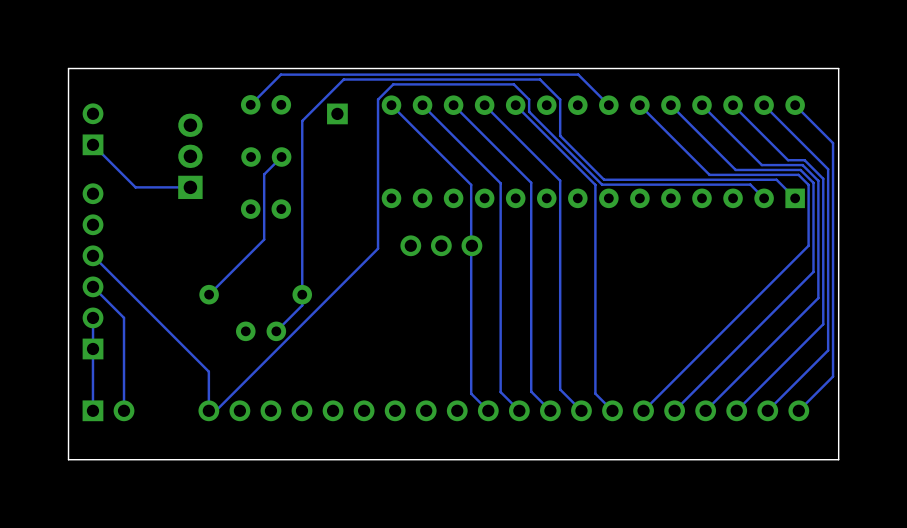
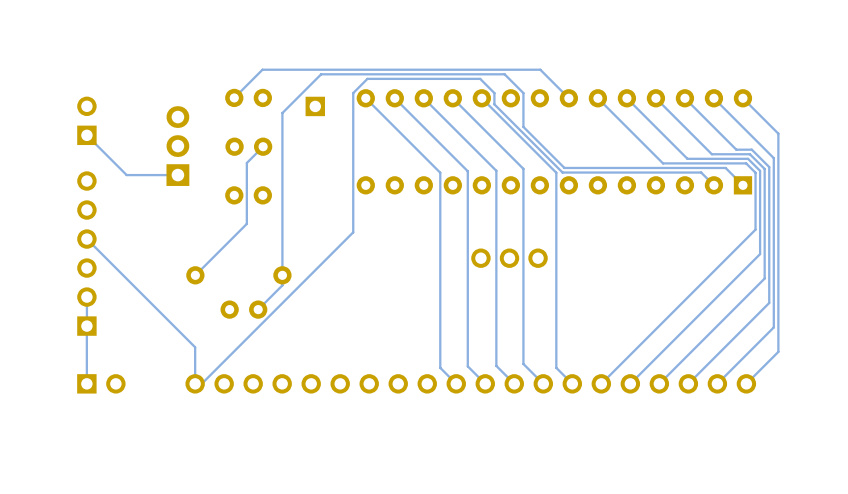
board edge: (838, 68) (68, 68) (68, 459) (838, 459) (838, 68) -> none
part position: (441, 245) -> (509, 258)
track: (93, 286) (124, 317) (124, 410) -> none

